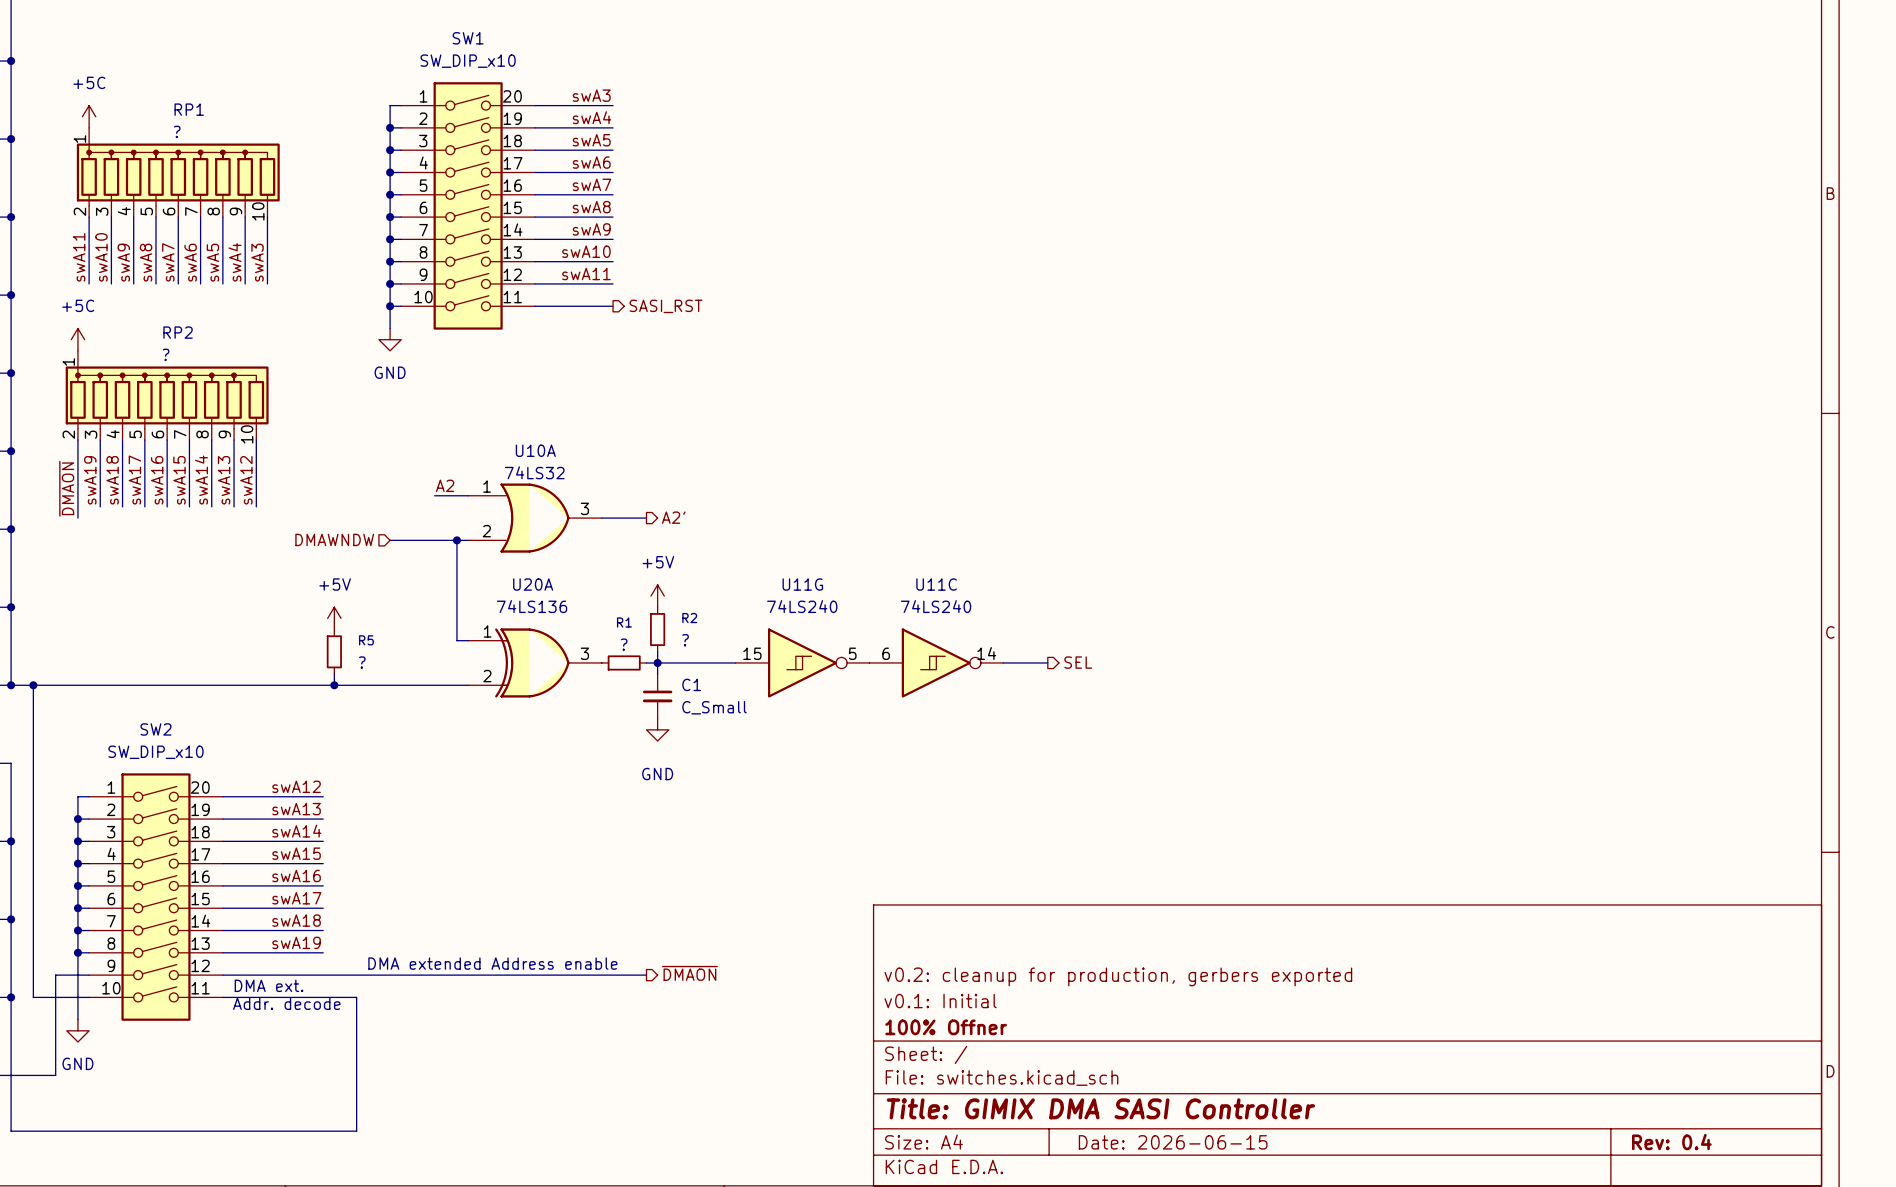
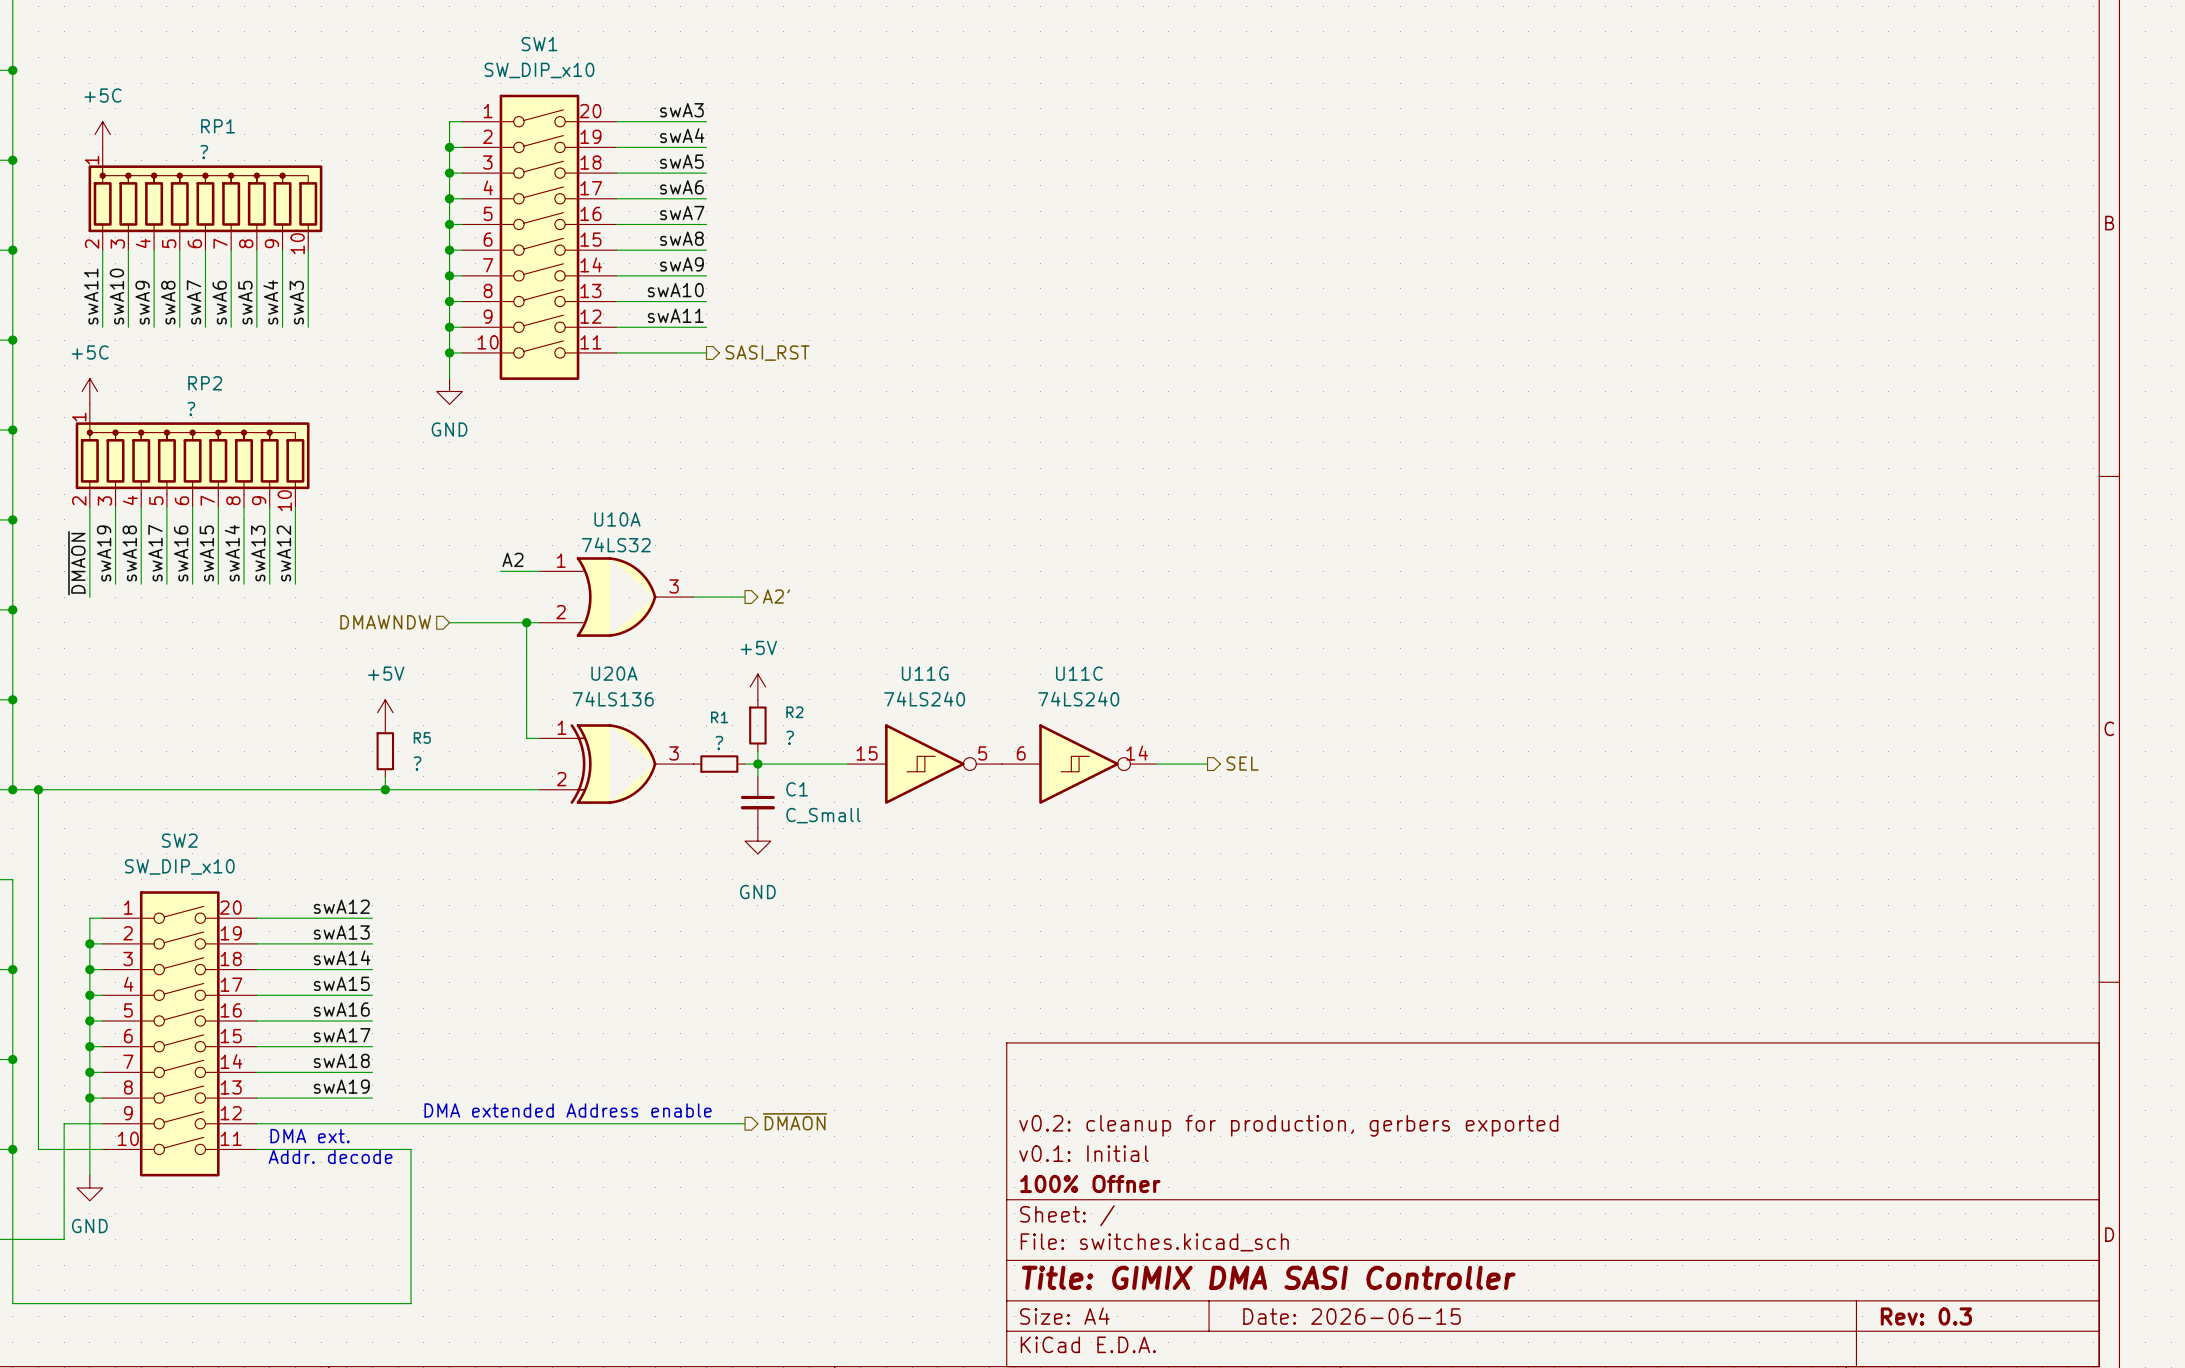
title block: Rev: 0.4 (1671, 1142) -> Rev: 0.3 (1926, 1316)

